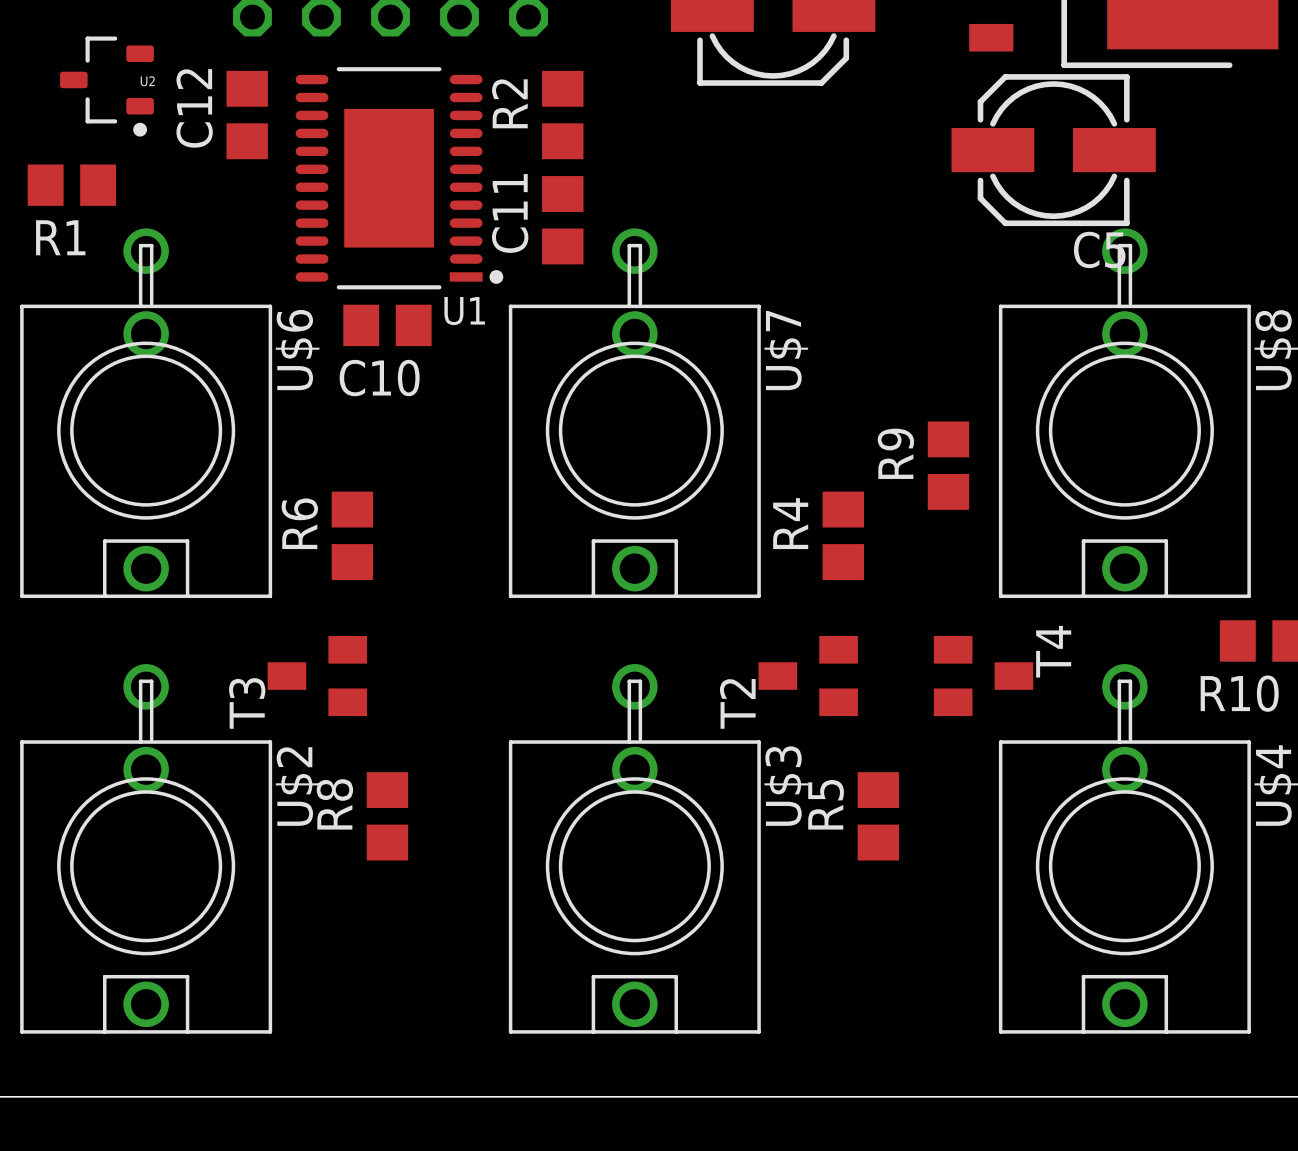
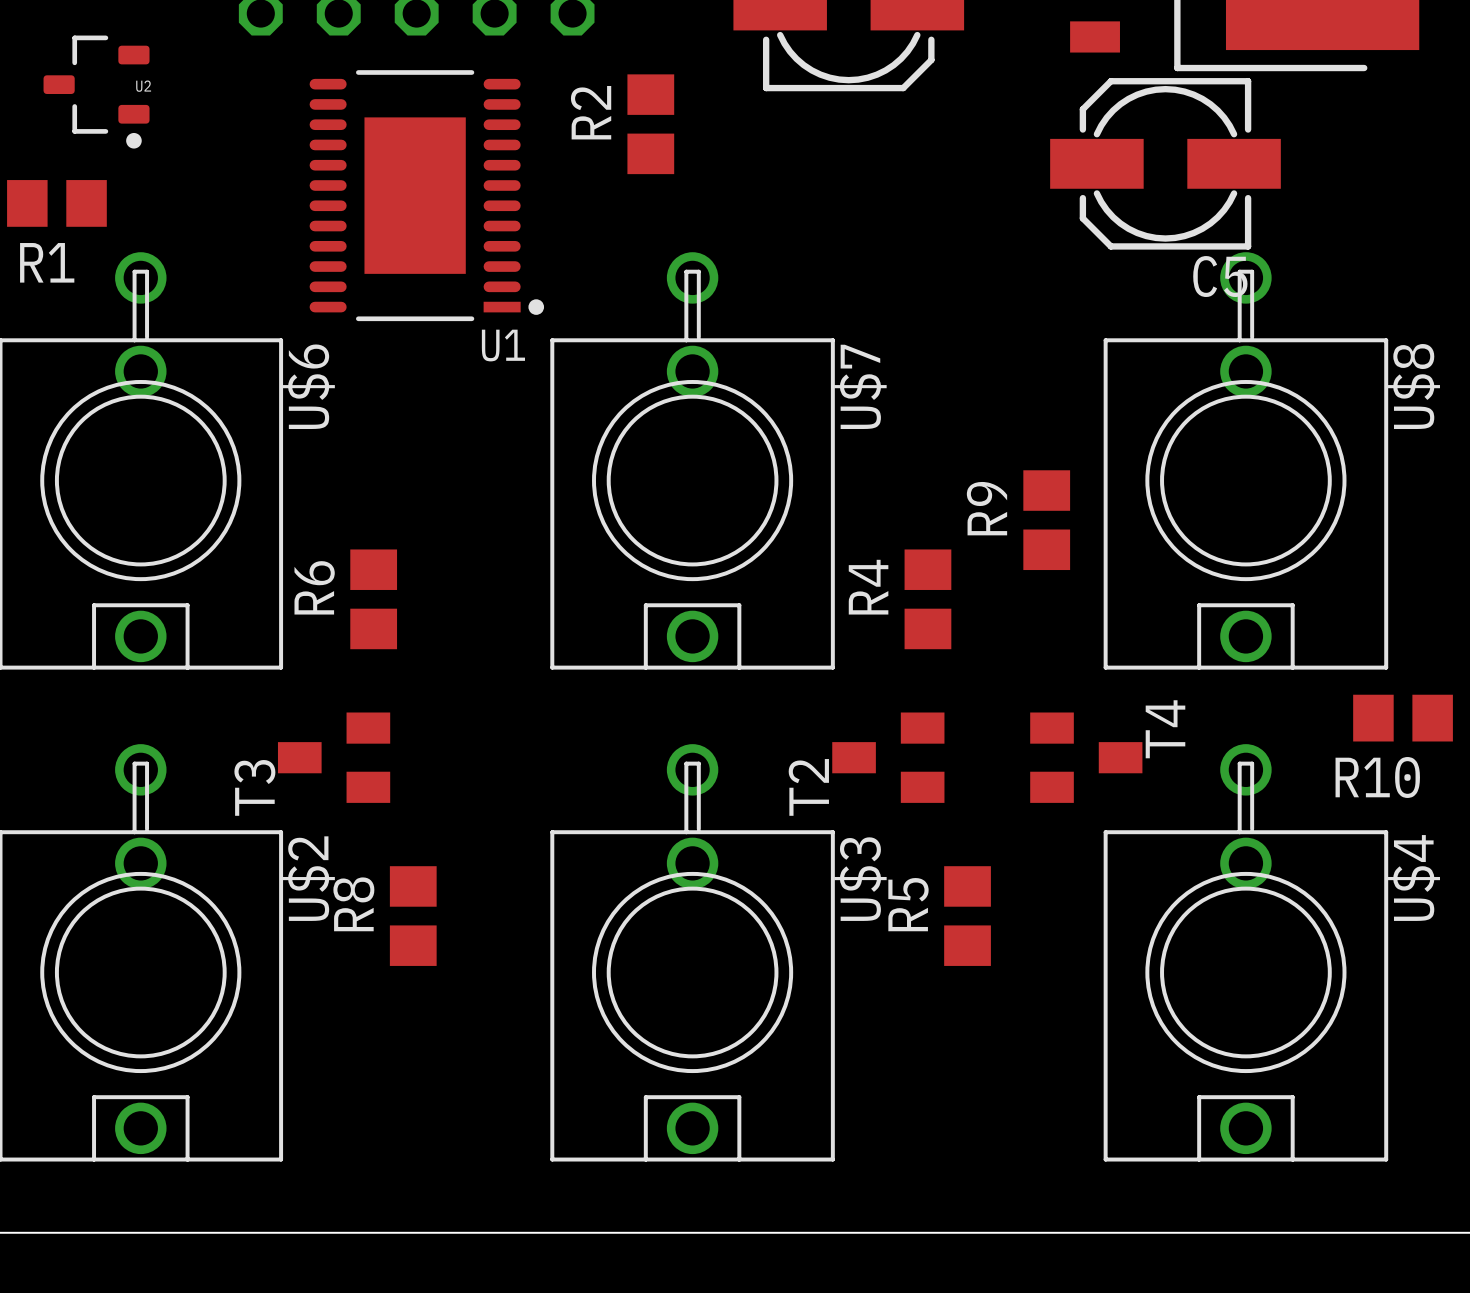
C12: (247, 115) -> none
R2 position: (562, 115) -> (650, 124)
C11: (562, 220) -> none
C10: (387, 325) -> none

